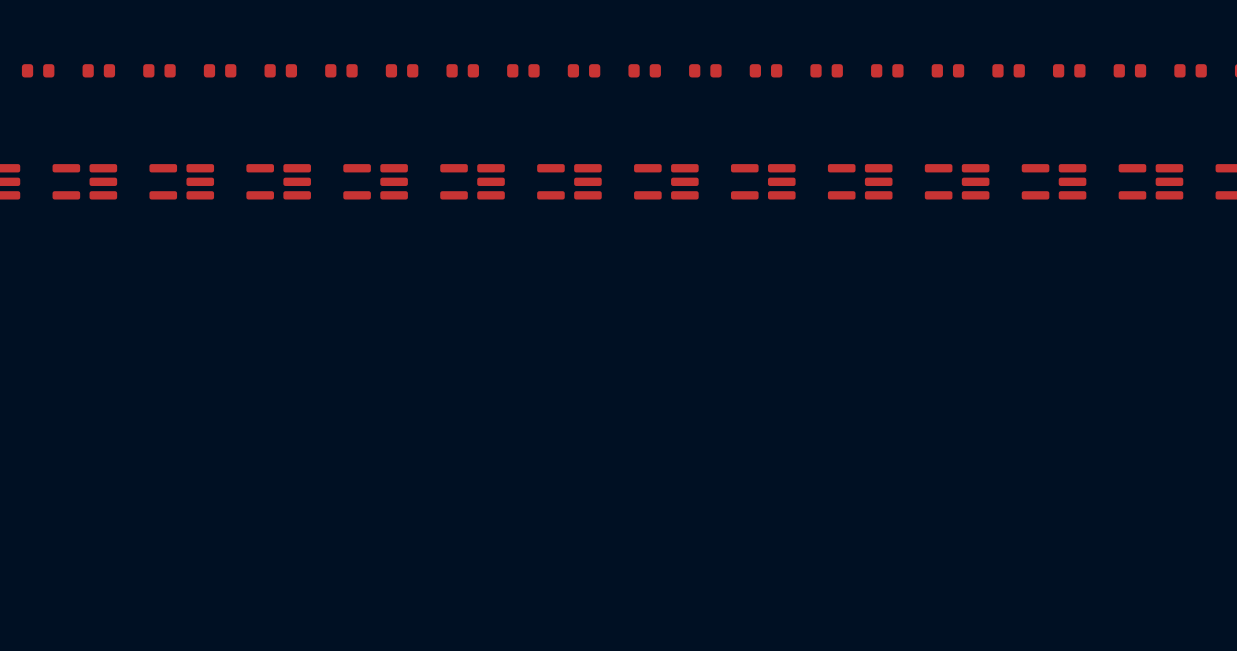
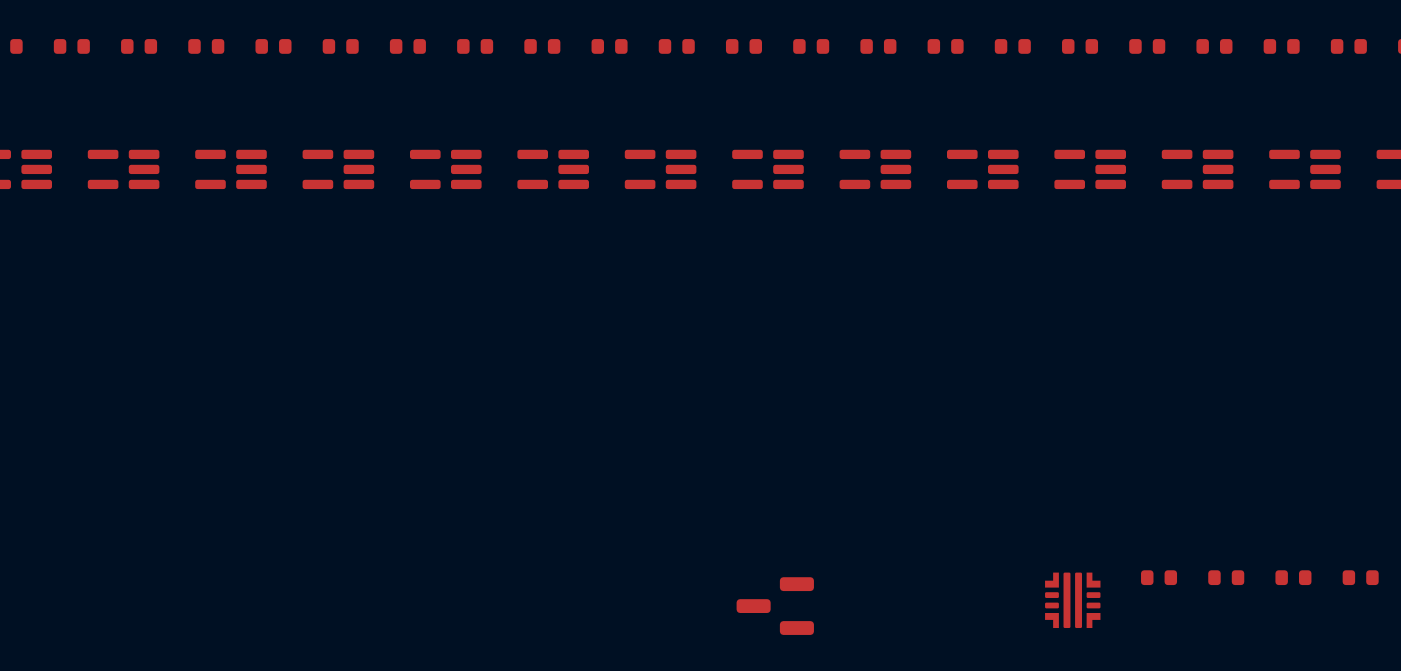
part: none -> (1159, 577)
part: none -> (1226, 577)
part: none -> (1293, 577)
part: none -> (1360, 577)
part: none -> (1072, 600)
part: none -> (775, 606)

